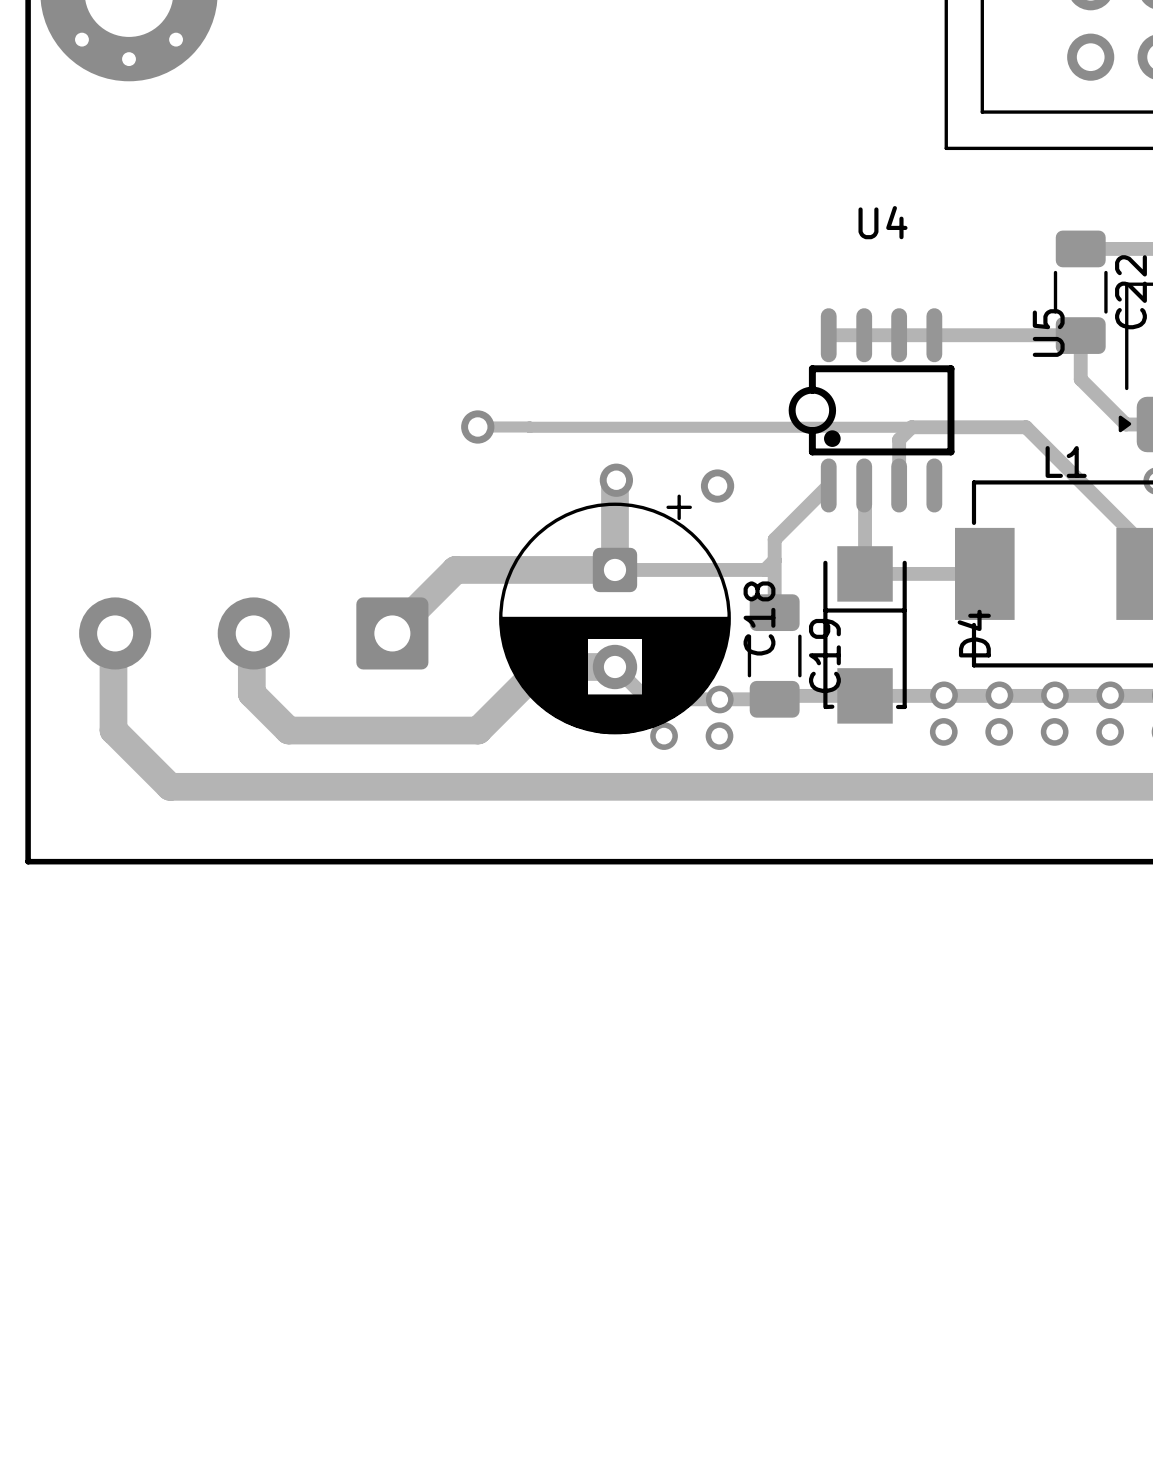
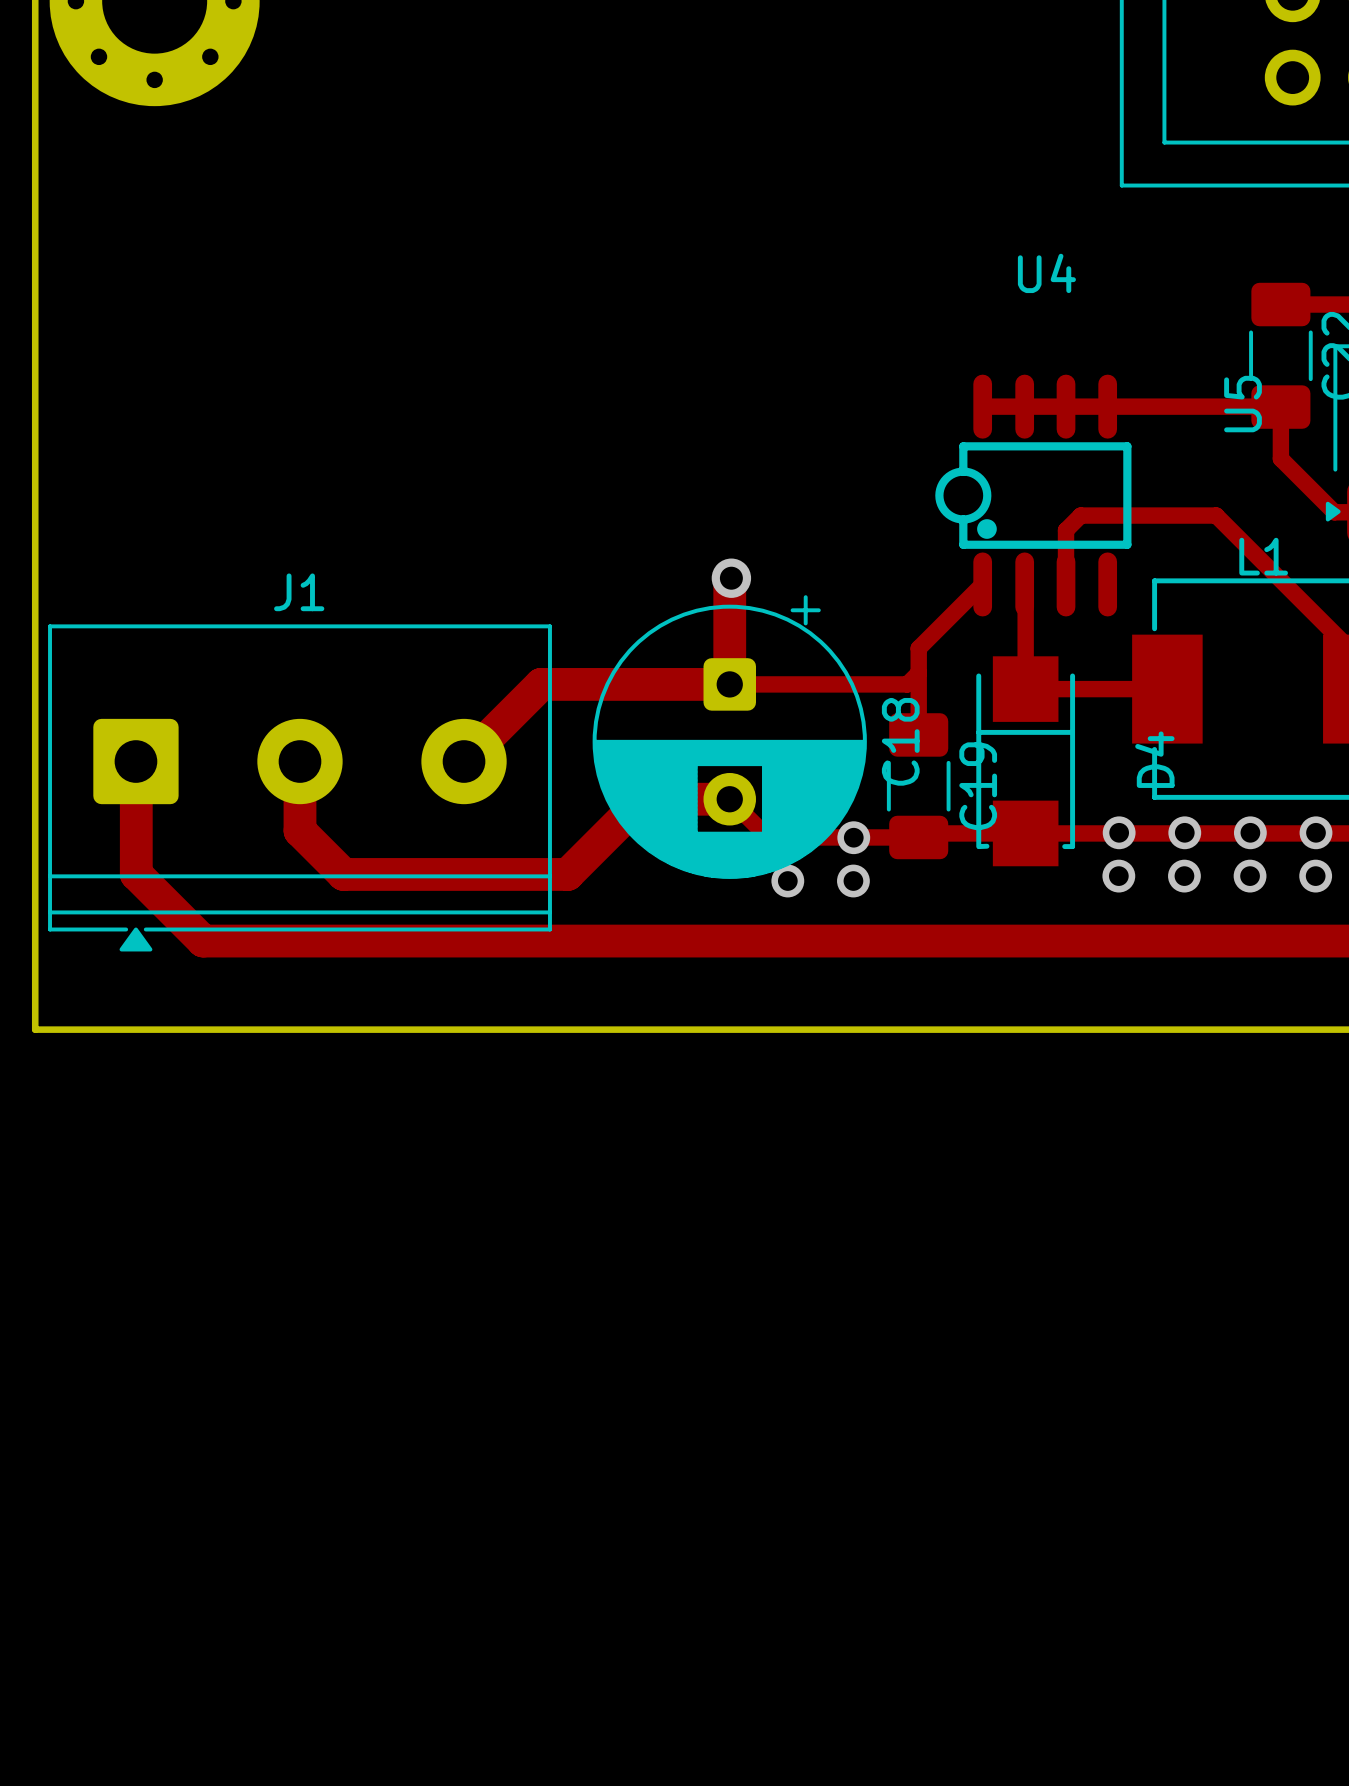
track: (477, 426) (529, 426) -> none
via: (477, 426) -> none
track: (529, 427) (911, 427) -> none
via: (717, 486) -> none
J1 side: bottom (253, 633) -> top (299, 787)

